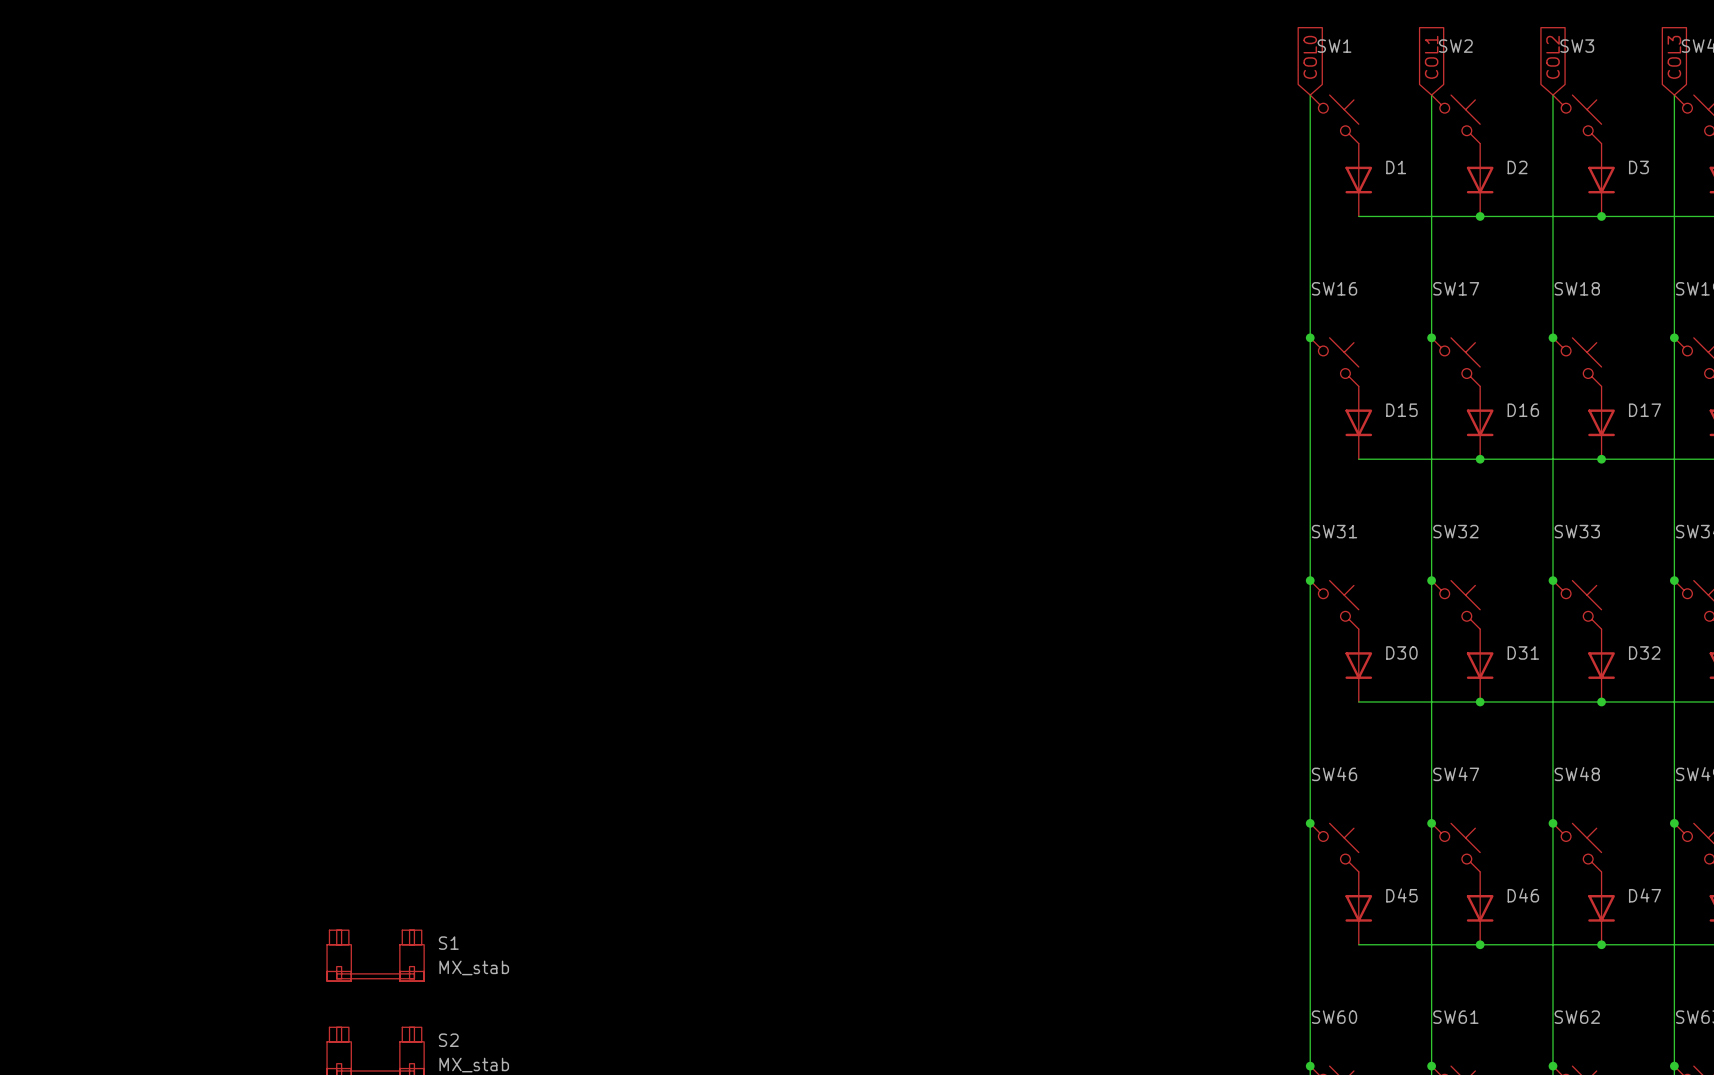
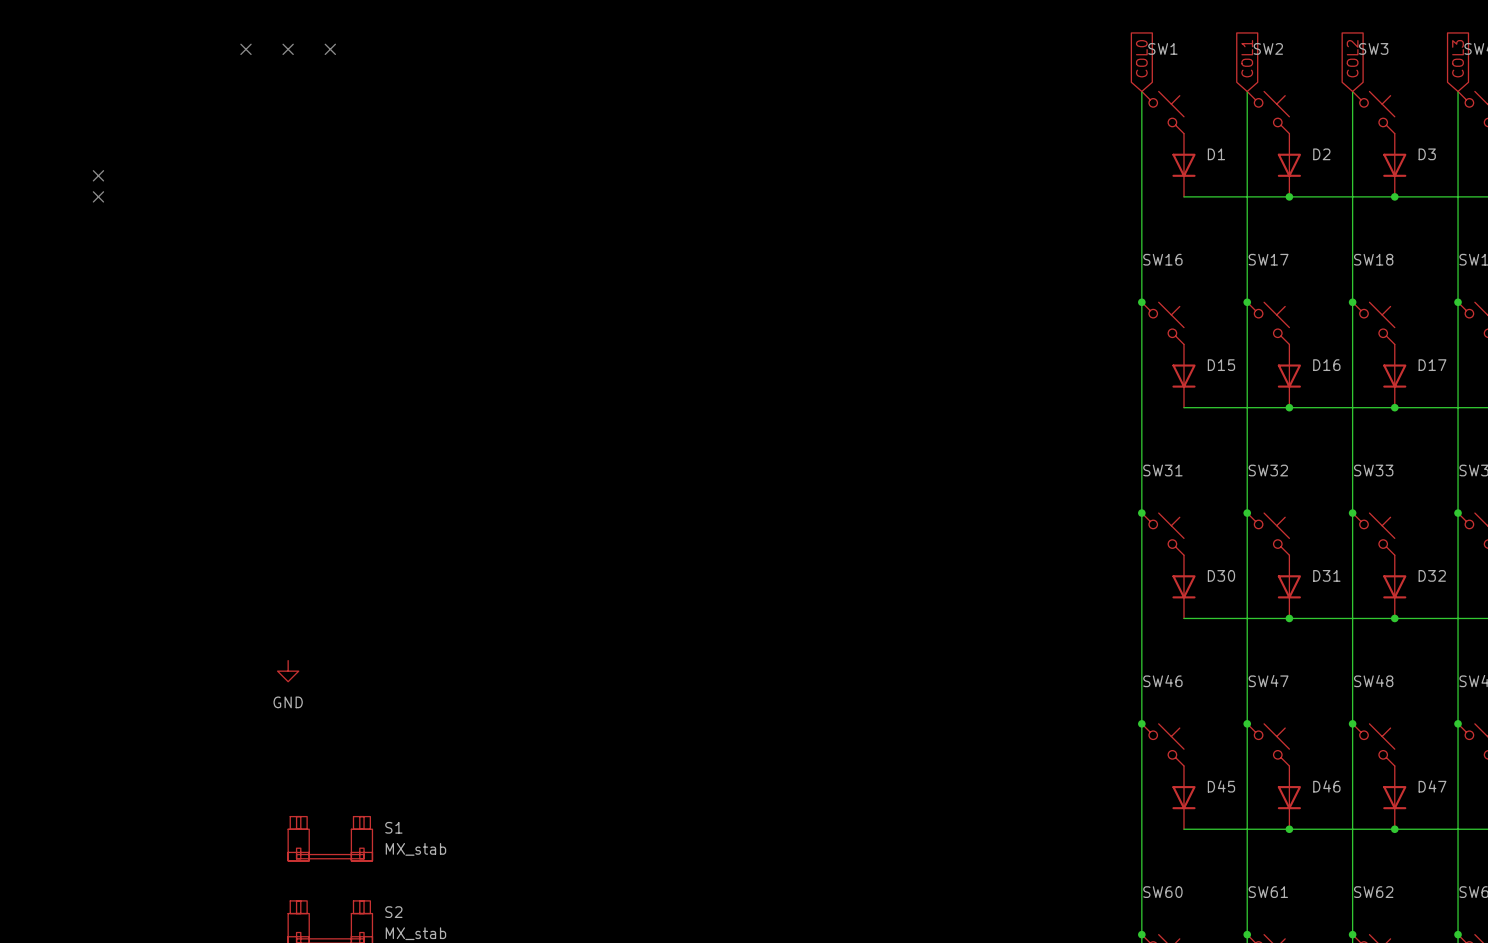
no-connect mark: none -> (245, 49)
no-connect mark: none -> (288, 49)
no-connect mark: none -> (330, 49)
no-connect mark: none -> (98, 175)
no-connect mark: none -> (98, 196)
power symbol: none -> GND (288, 671)

